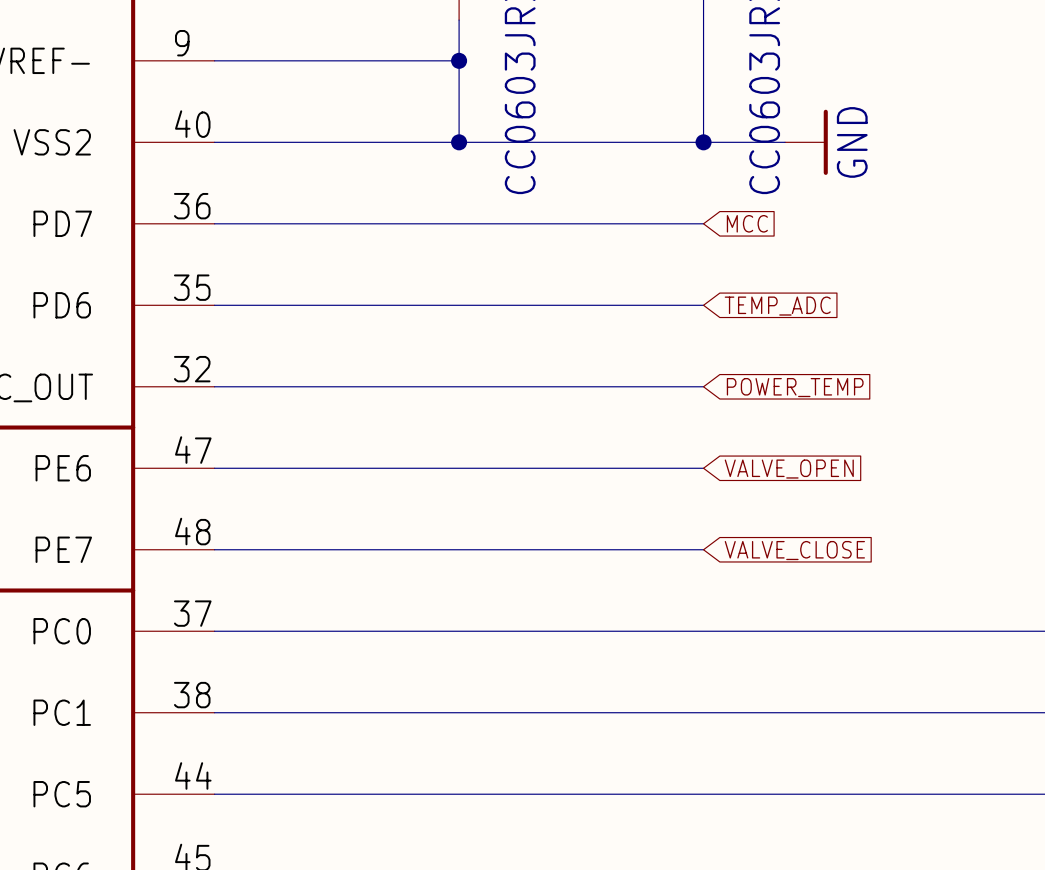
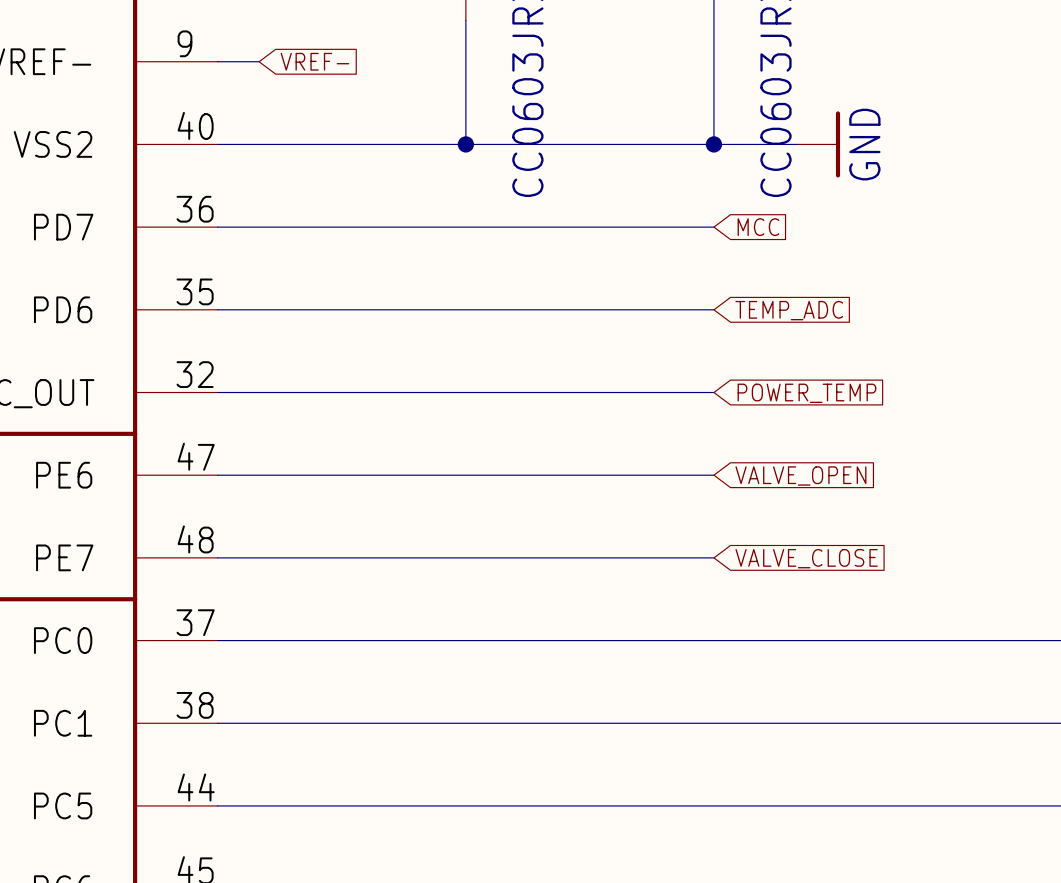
wire: (255, 60) (459, 60) -> none
global label: none -> VREF- (314, 61)
junction: (459, 60) -> none

